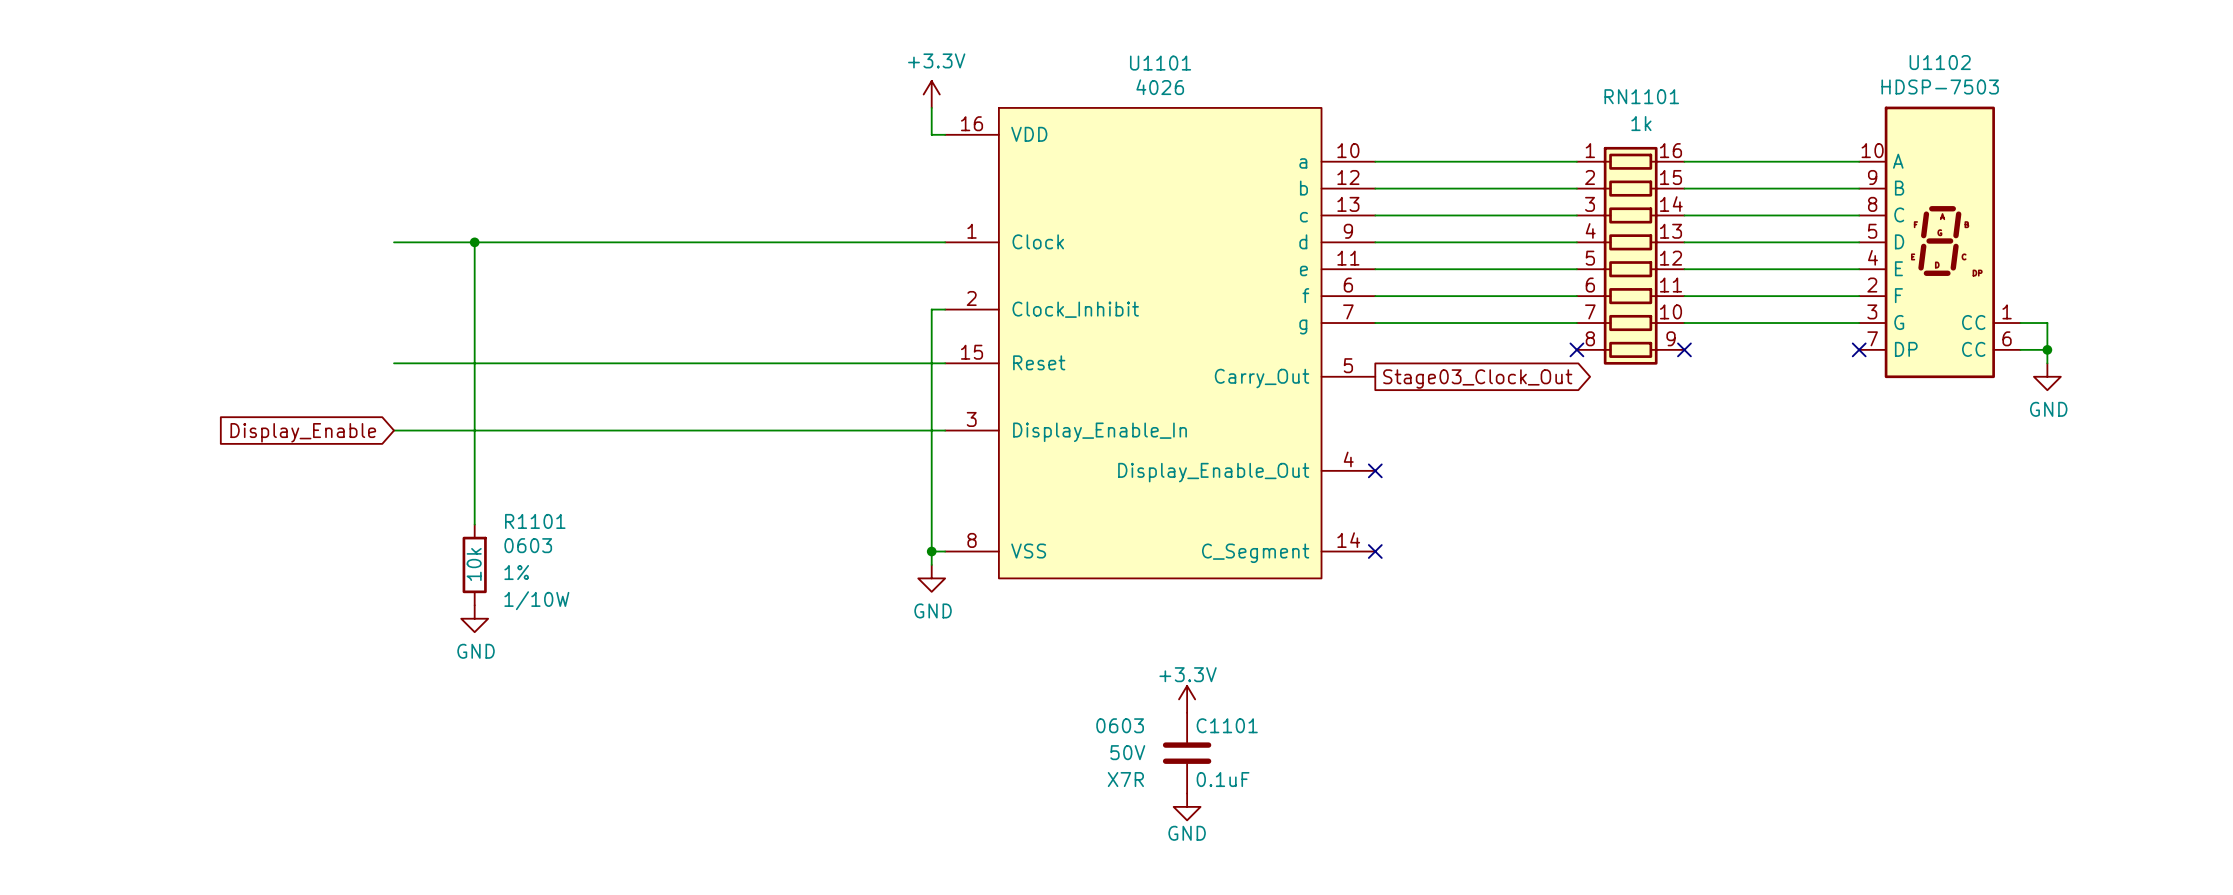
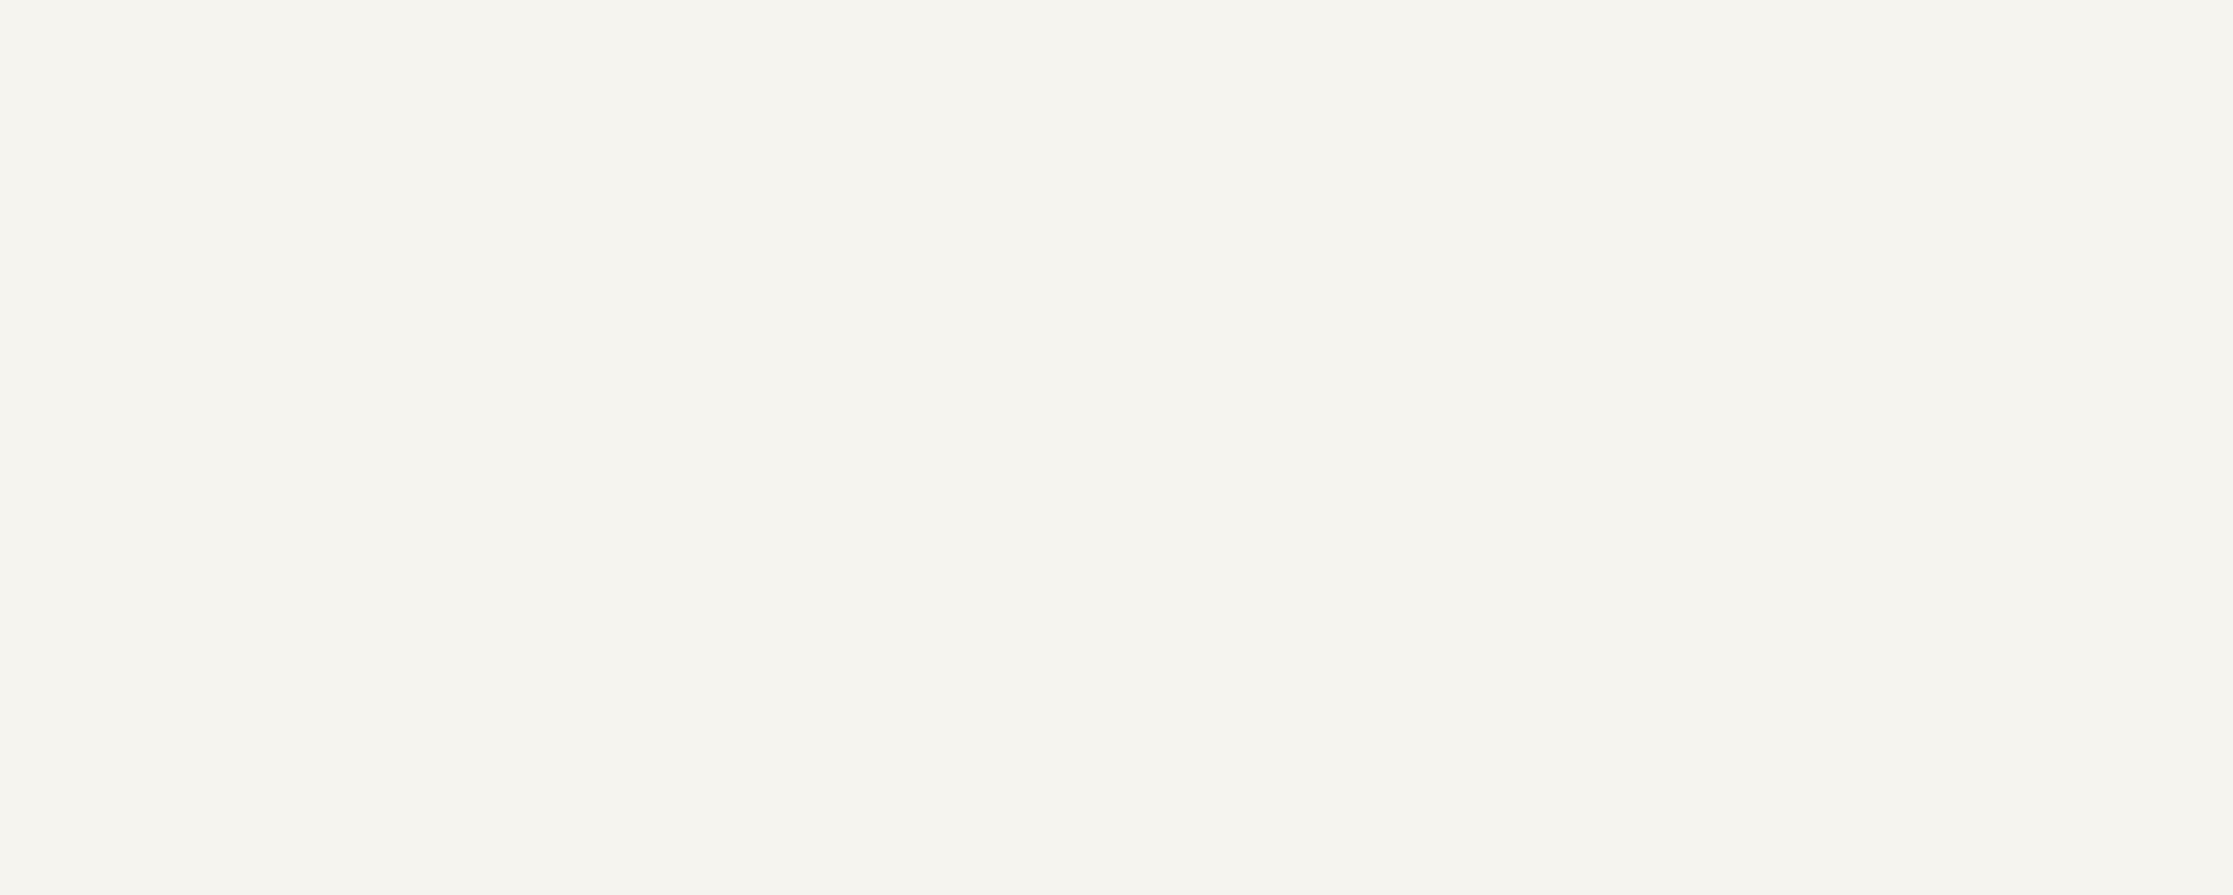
power symbol: +3.3V (931, 94) -> none
wire: (931, 107) (931, 134) (945, 134) -> none
wire: (1375, 161) (1576, 161) -> none
wire: (1684, 161) (1859, 161) -> none
wire: (1375, 188) (1576, 188) -> none
wire: (1684, 188) (1859, 188) -> none
wire: (1375, 215) (1576, 215) -> none
wire: (1684, 215) (1859, 215) -> none
wire: (394, 242) (945, 242) -> none
wire: (474, 242) (474, 524) -> none
junction: (474, 242) -> none
wire: (1375, 242) (1576, 242) -> none
wire: (1684, 242) (1859, 242) -> none
U1102: HDSP-7503 (1939, 242) -> none
RN1101: 1k (1630, 255) -> none
wire: (1375, 269) (1576, 269) -> none
wire: (1684, 269) (1859, 269) -> none
wire: (1375, 296) (1576, 296) -> none
wire: (1684, 296) (1859, 296) -> none
wire: (945, 309) (931, 309) (931, 564) -> none
wire: (1375, 323) (1576, 323) -> none
wire: (1684, 323) (1859, 323) -> none
wire: (2020, 323) (2047, 323) (2047, 363) -> none
U1101: 4026 (1160, 343) -> none
no-connect mark: (1576, 349) -> none
no-connect mark: (1684, 349) -> none
no-connect mark: (1859, 349) -> none
wire: (2020, 349) (2047, 349) -> none
junction: (2047, 349) -> none
wire: (394, 363) (945, 363) -> none
power symbol: GND (2047, 376) -> none
global label: Stage03_Clock_Out (1477, 379) -> none
wire: (394, 430) (945, 430) -> none
global label: Display_Enable (303, 432) -> none
no-connect mark: (1375, 470) -> none
wire: (931, 551) (945, 551) -> none
junction: (931, 551) -> none
no-connect mark: (1375, 551) -> none
R1101: 10k (474, 564) -> none
power symbol: GND (931, 578) -> none
power symbol: GND (474, 618) -> none
power symbol: +3.3V (1187, 699) -> none
C1101: 0.1uF (1187, 753) -> none
power symbol: GND (1187, 806) -> none

